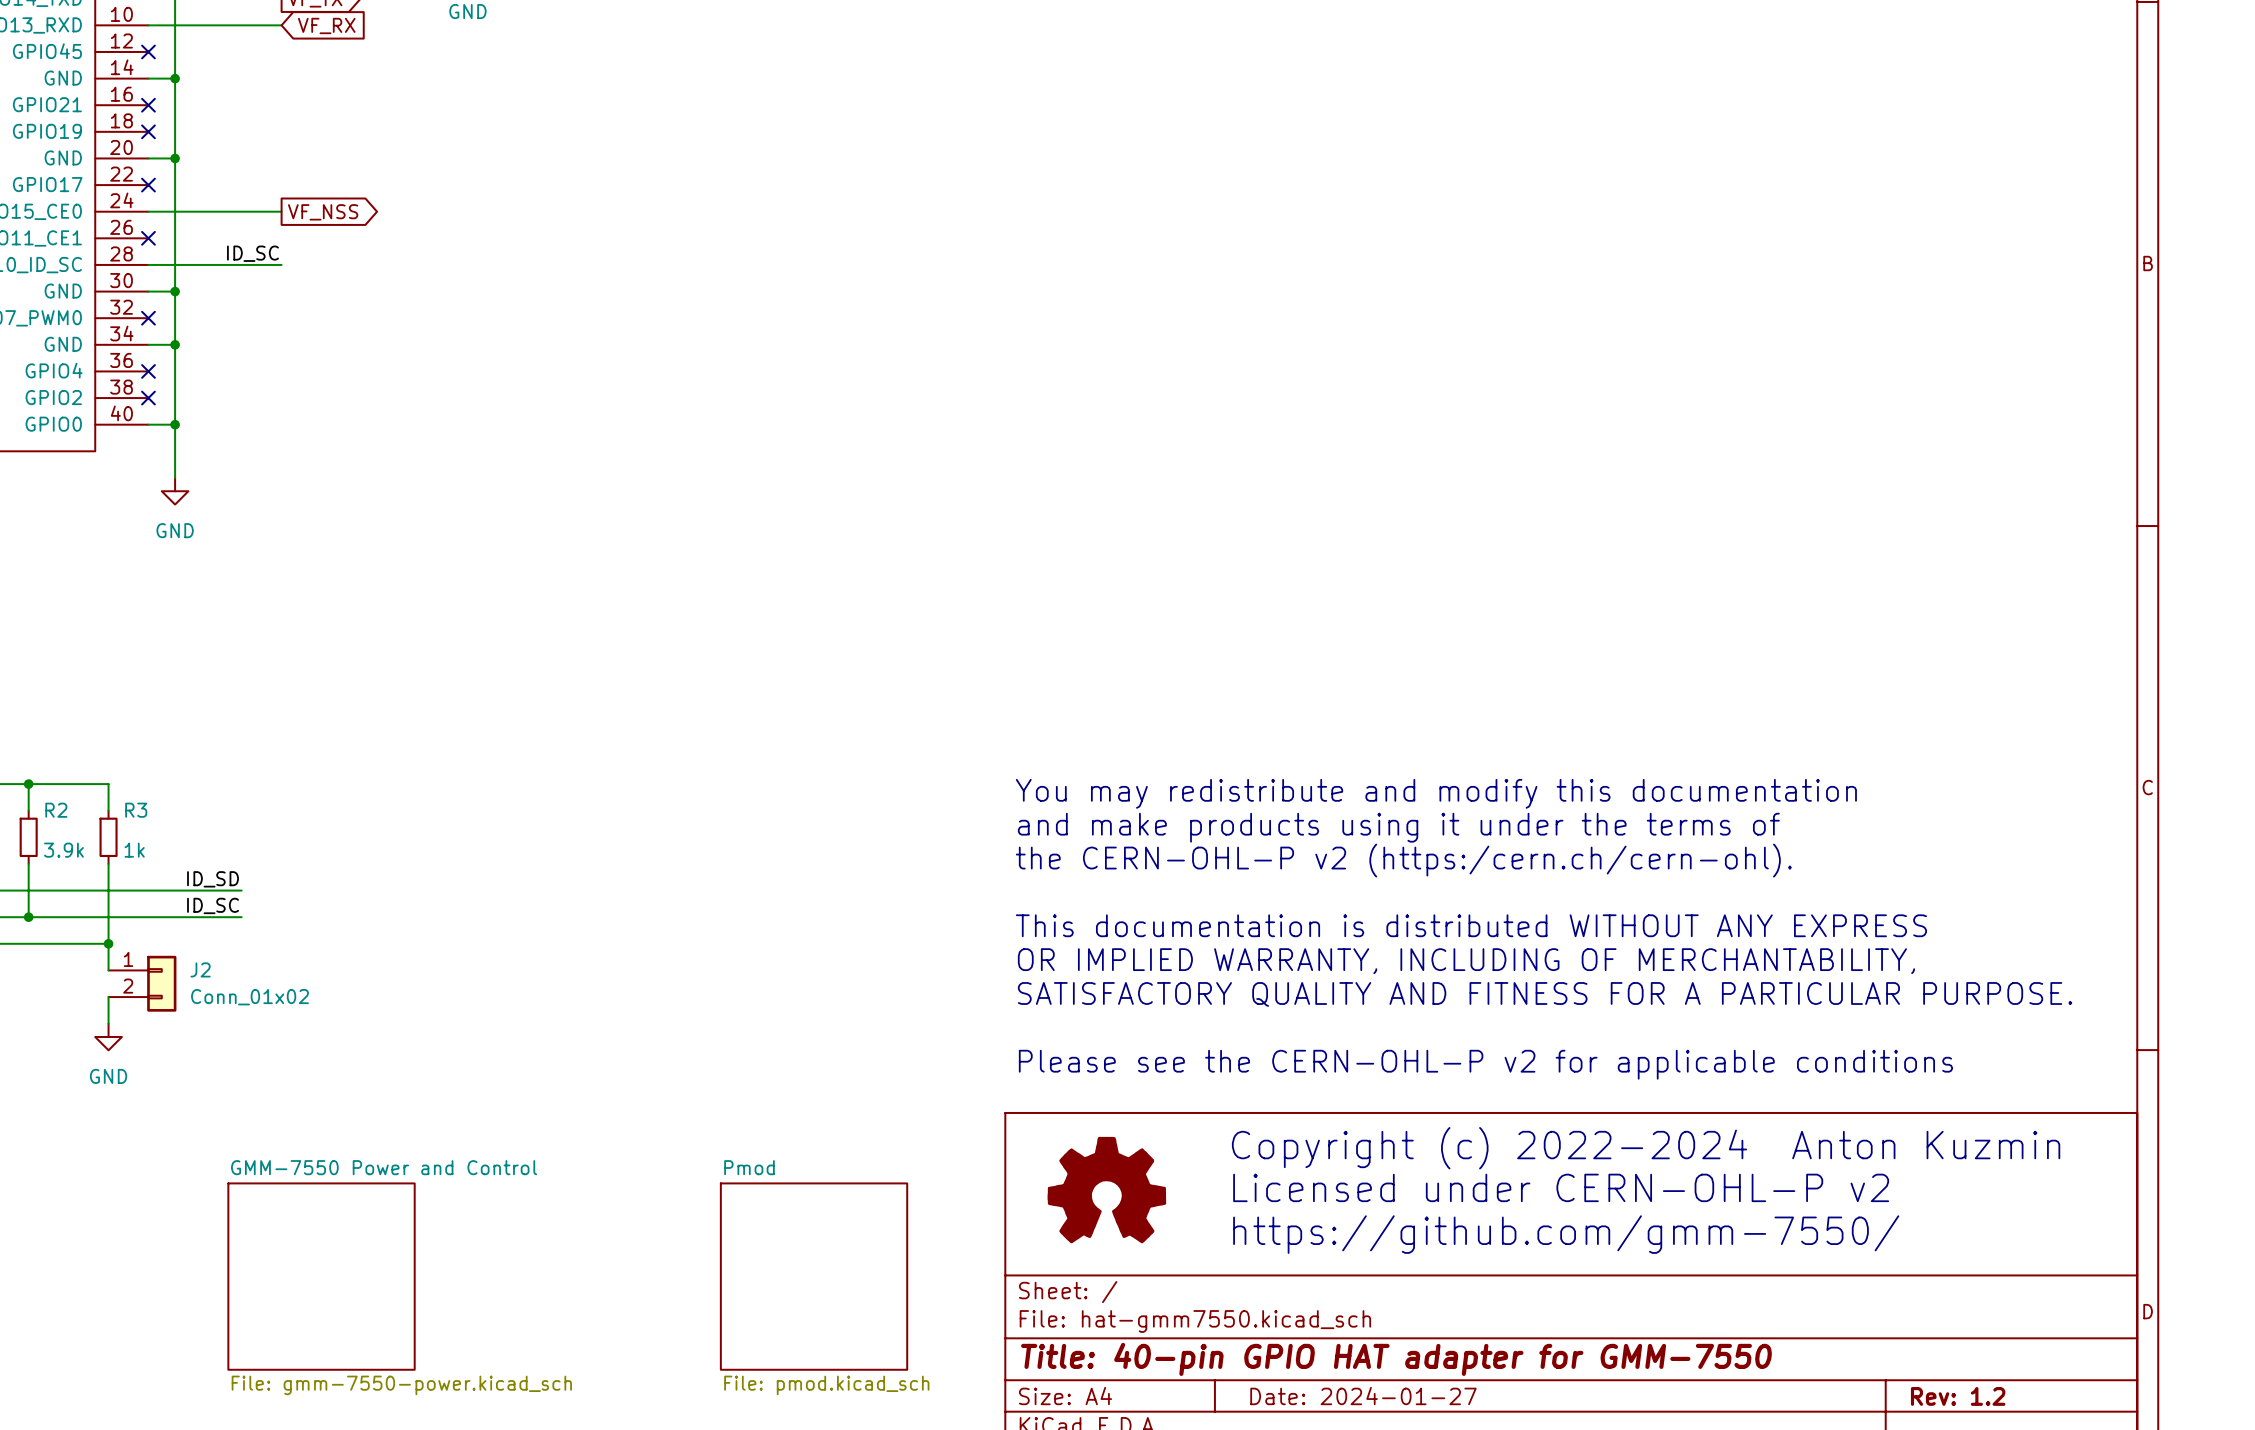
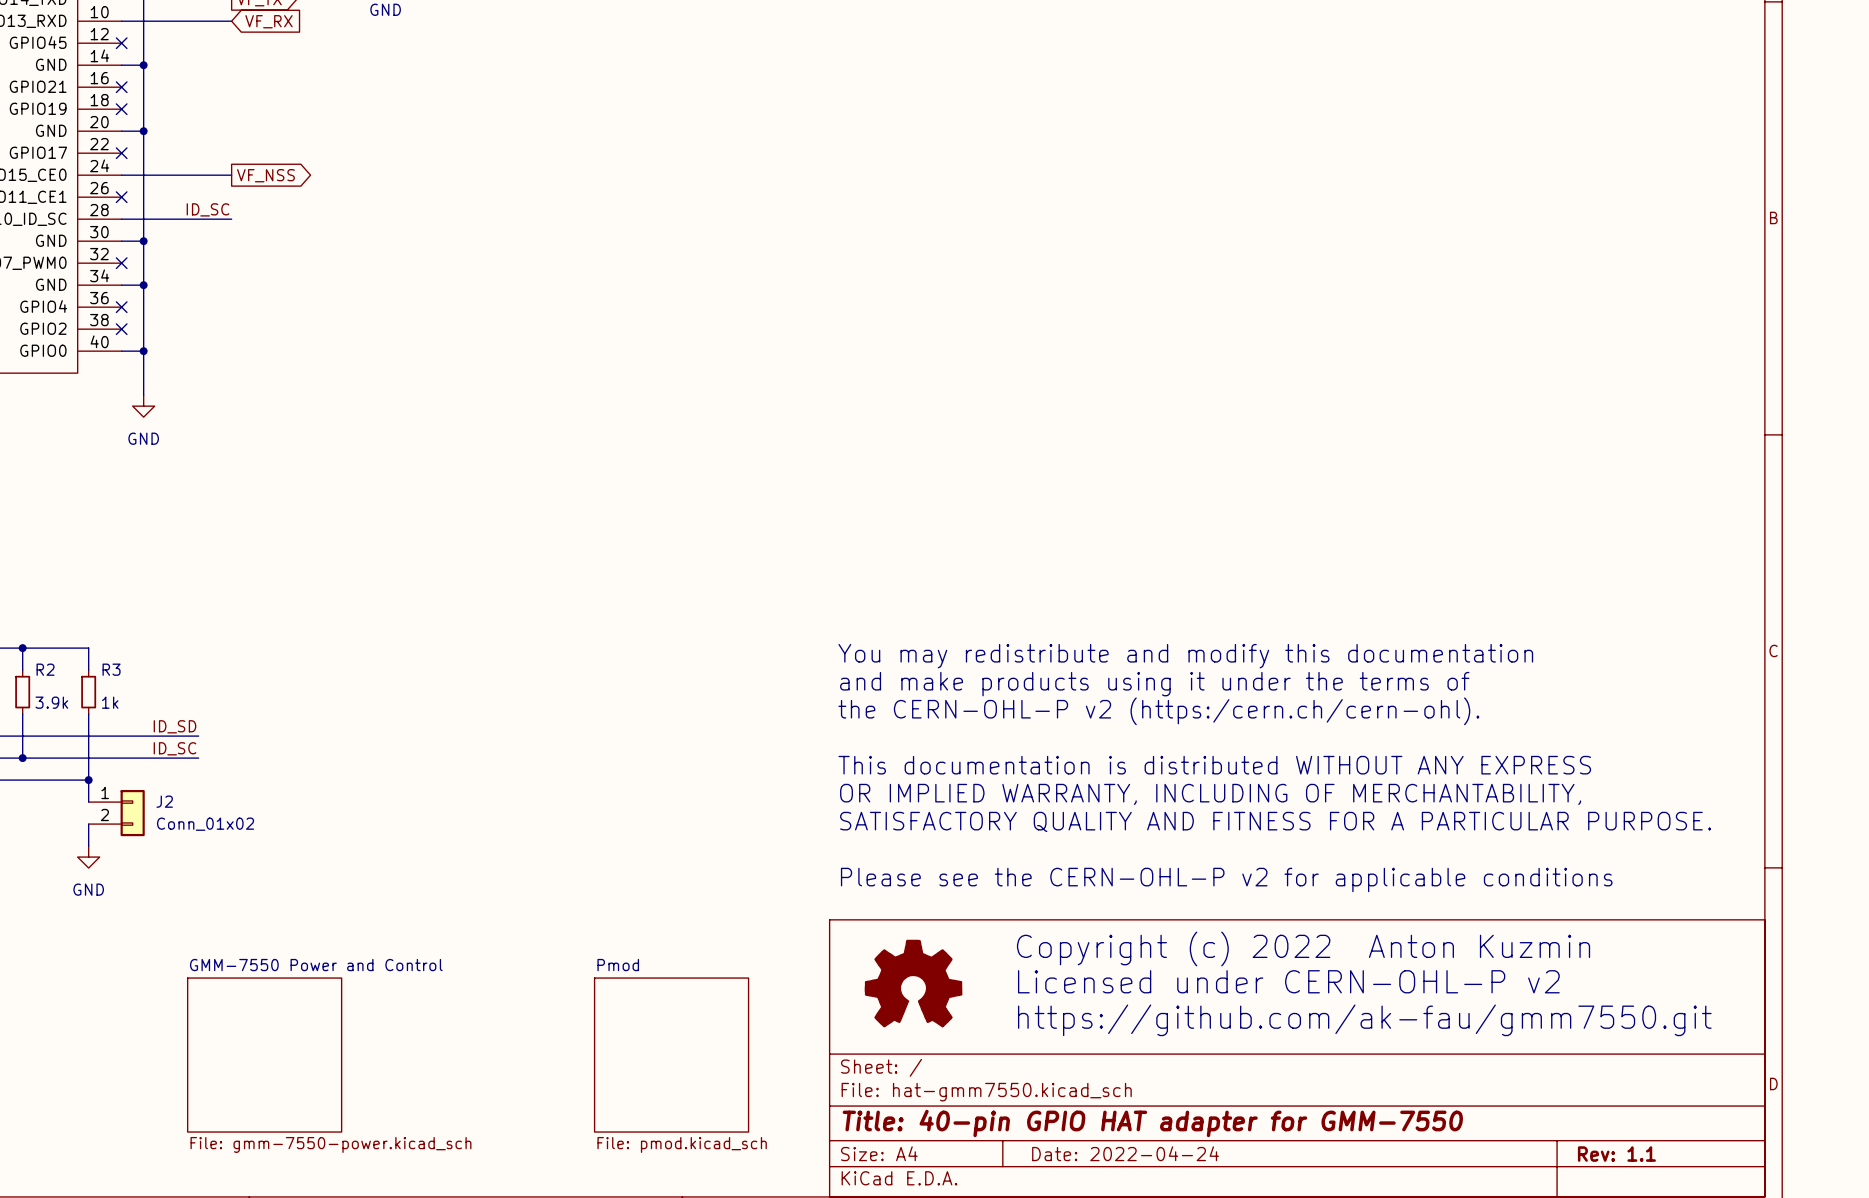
text: Copyright (c) 2022-2024 Anton Kuzmin (1646, 1148) -> Copyright (c) 2022 Anton Kuzmin (1303, 948)
text: https://github.com/gmm-7550/ (1566, 1234) -> https://github.com/ak-fau/gmm7550.git (1364, 1020)
title block: Date: 2024-01-27 (1363, 1396) -> Date: 2022-04-24 (1125, 1153)
title block: Rev: 1.2 (1958, 1396) -> Rev: 1.1 (1616, 1154)

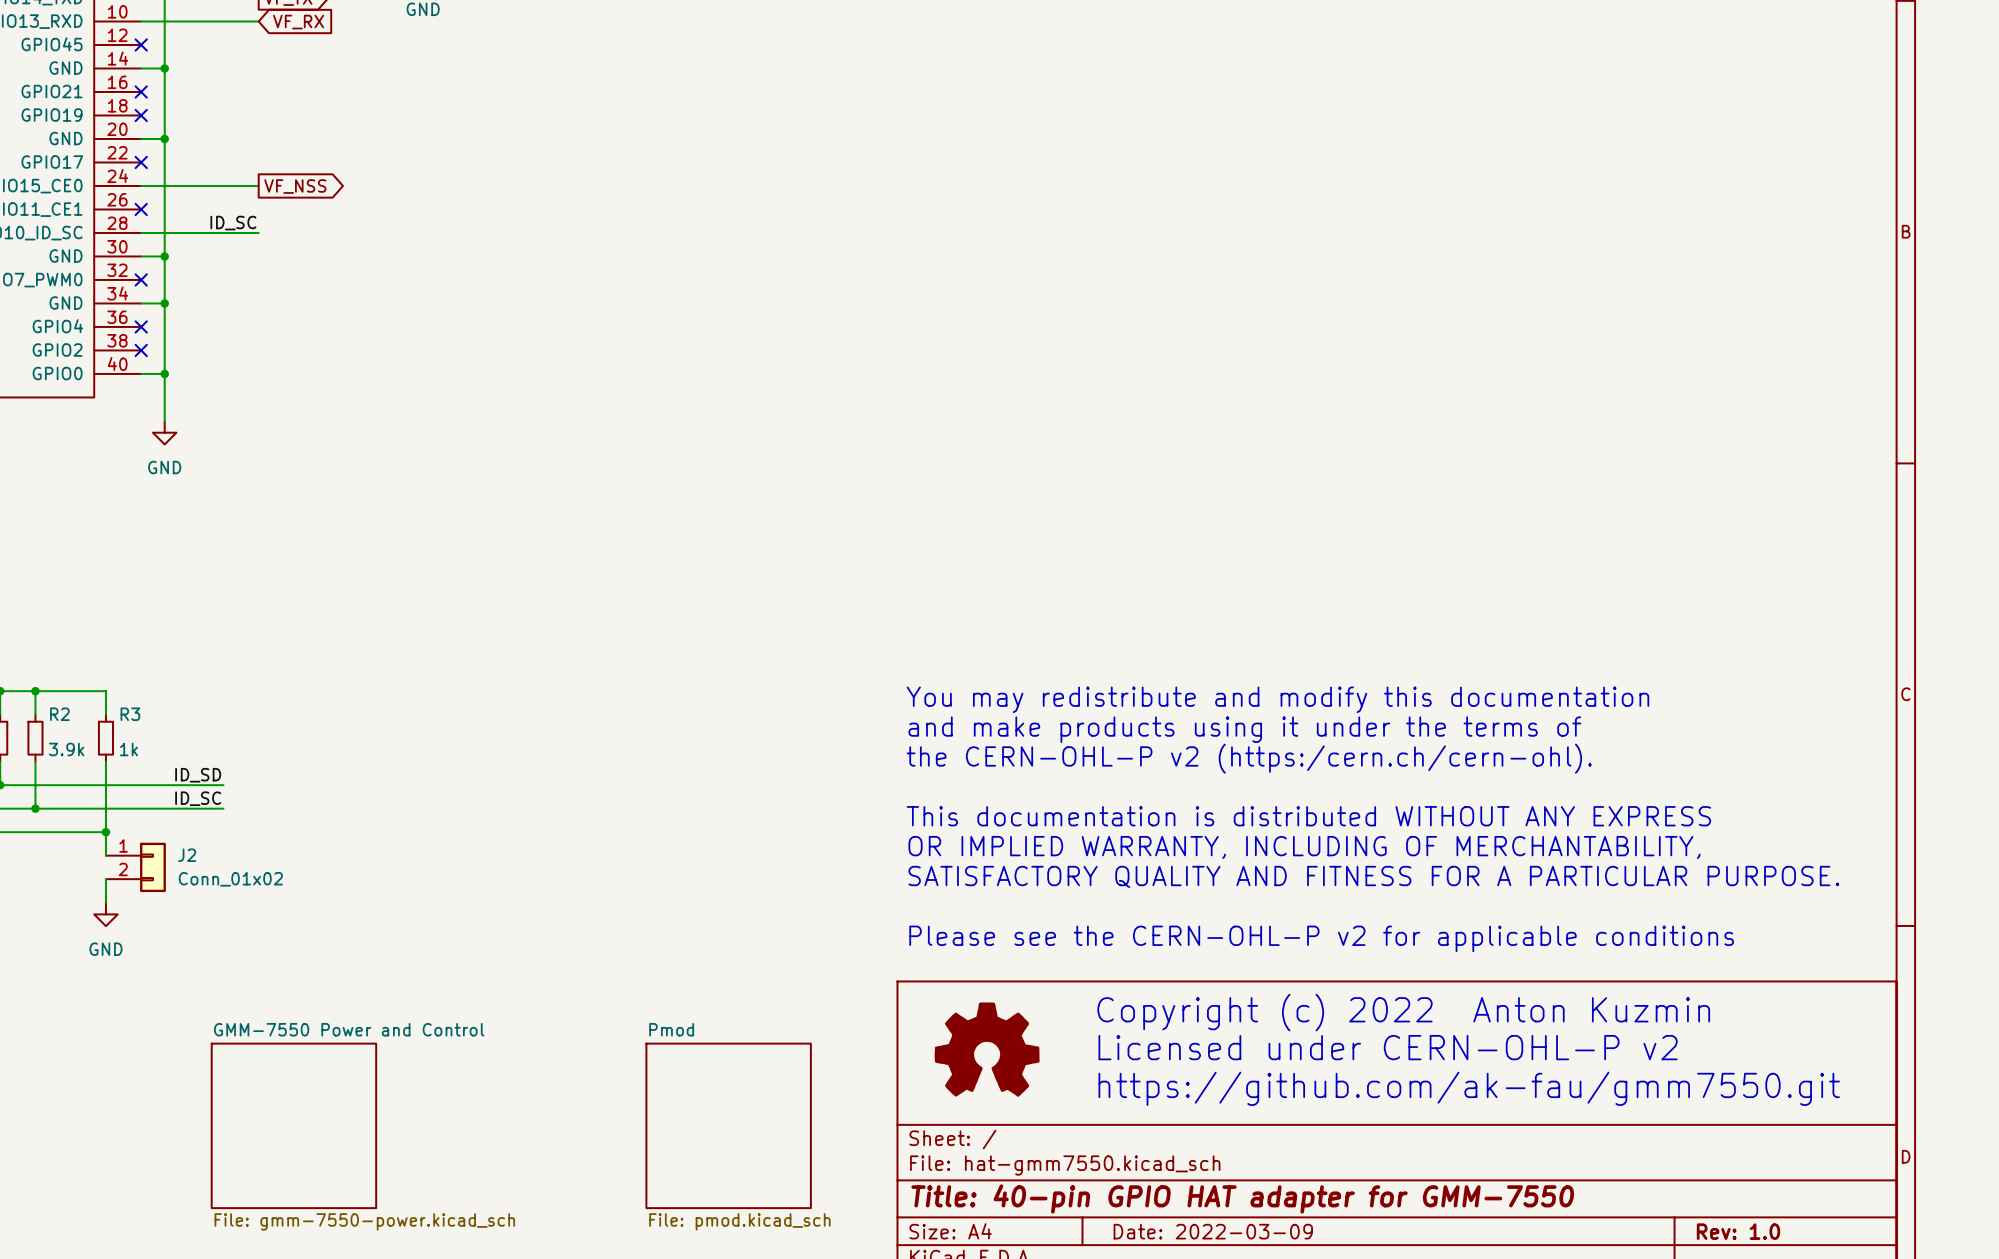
title block: Date: 2022-04-24 (1125, 1153) -> Date: 2022-03-09 (1213, 1231)
title block: Rev: 1.1 (1616, 1154) -> Rev: 1.0 (1738, 1231)

